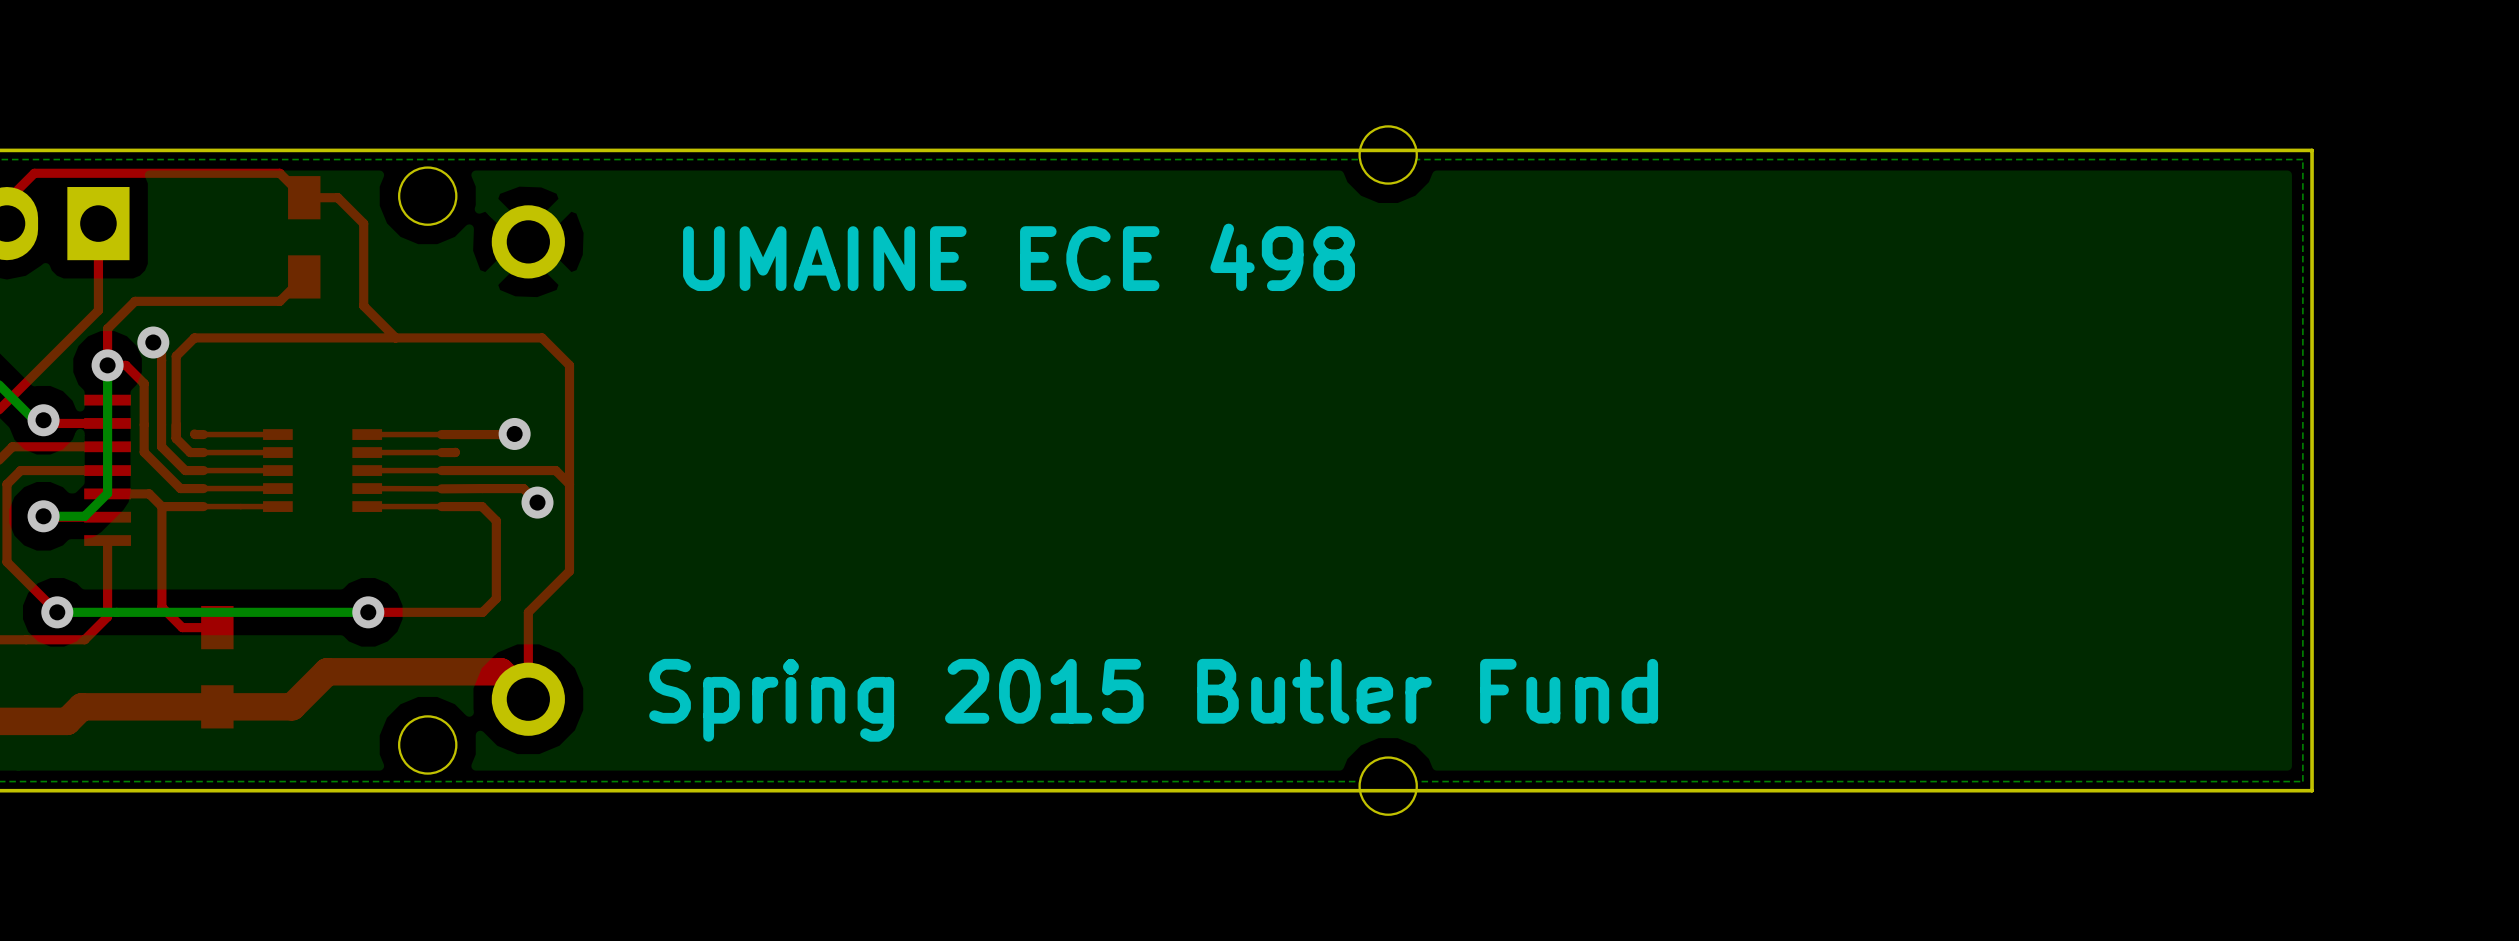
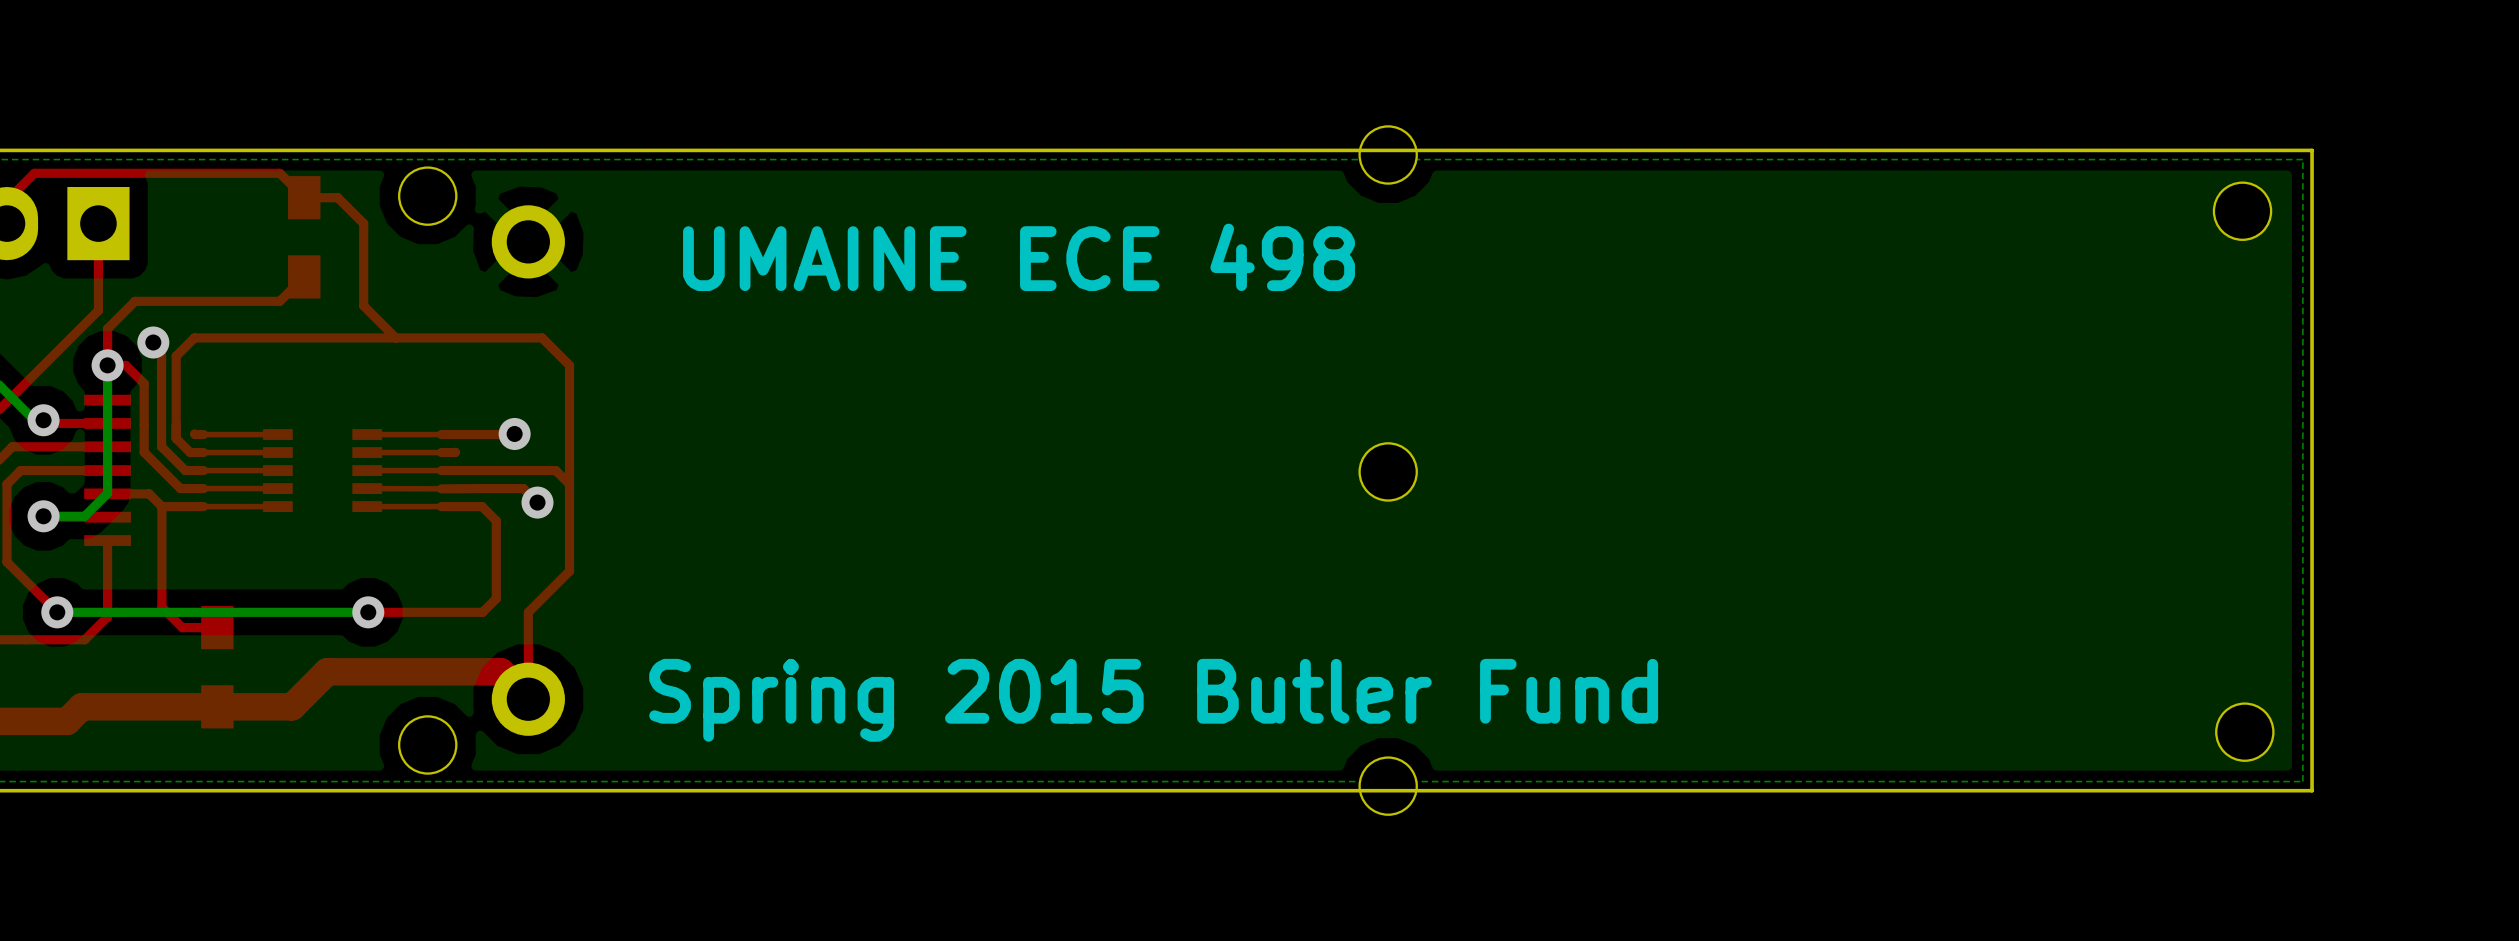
part: none -> (2242, 211)
part: none -> (1388, 471)
part: none -> (2244, 732)

